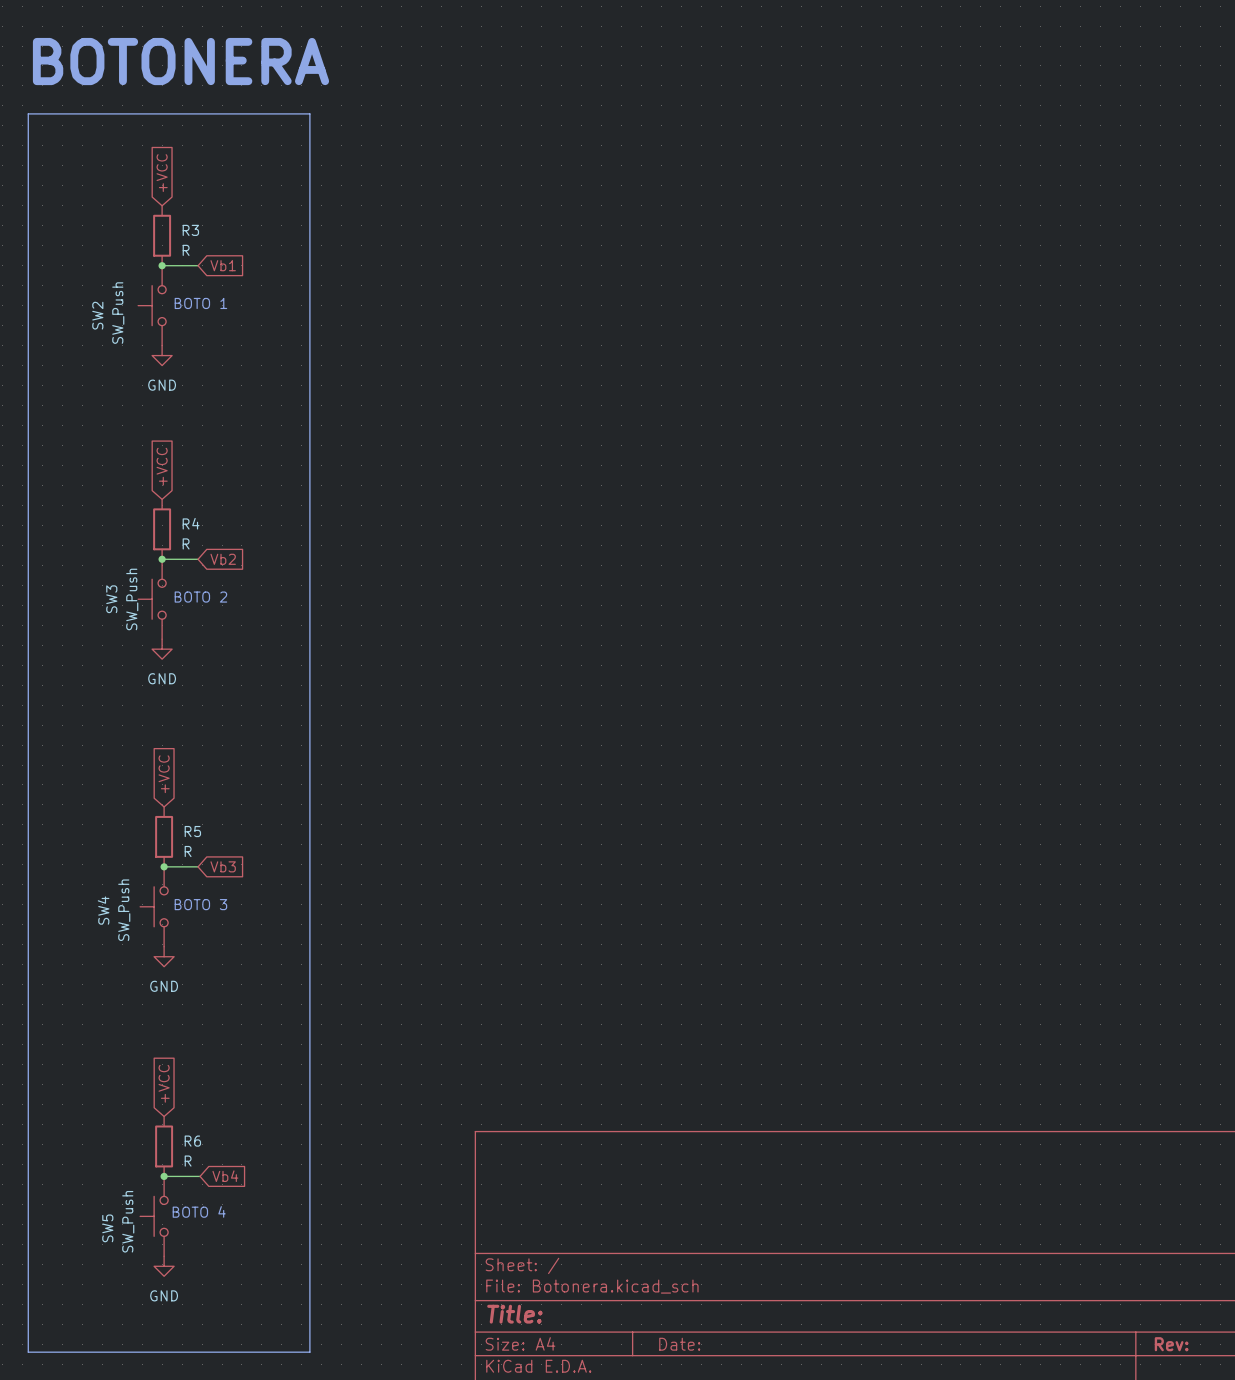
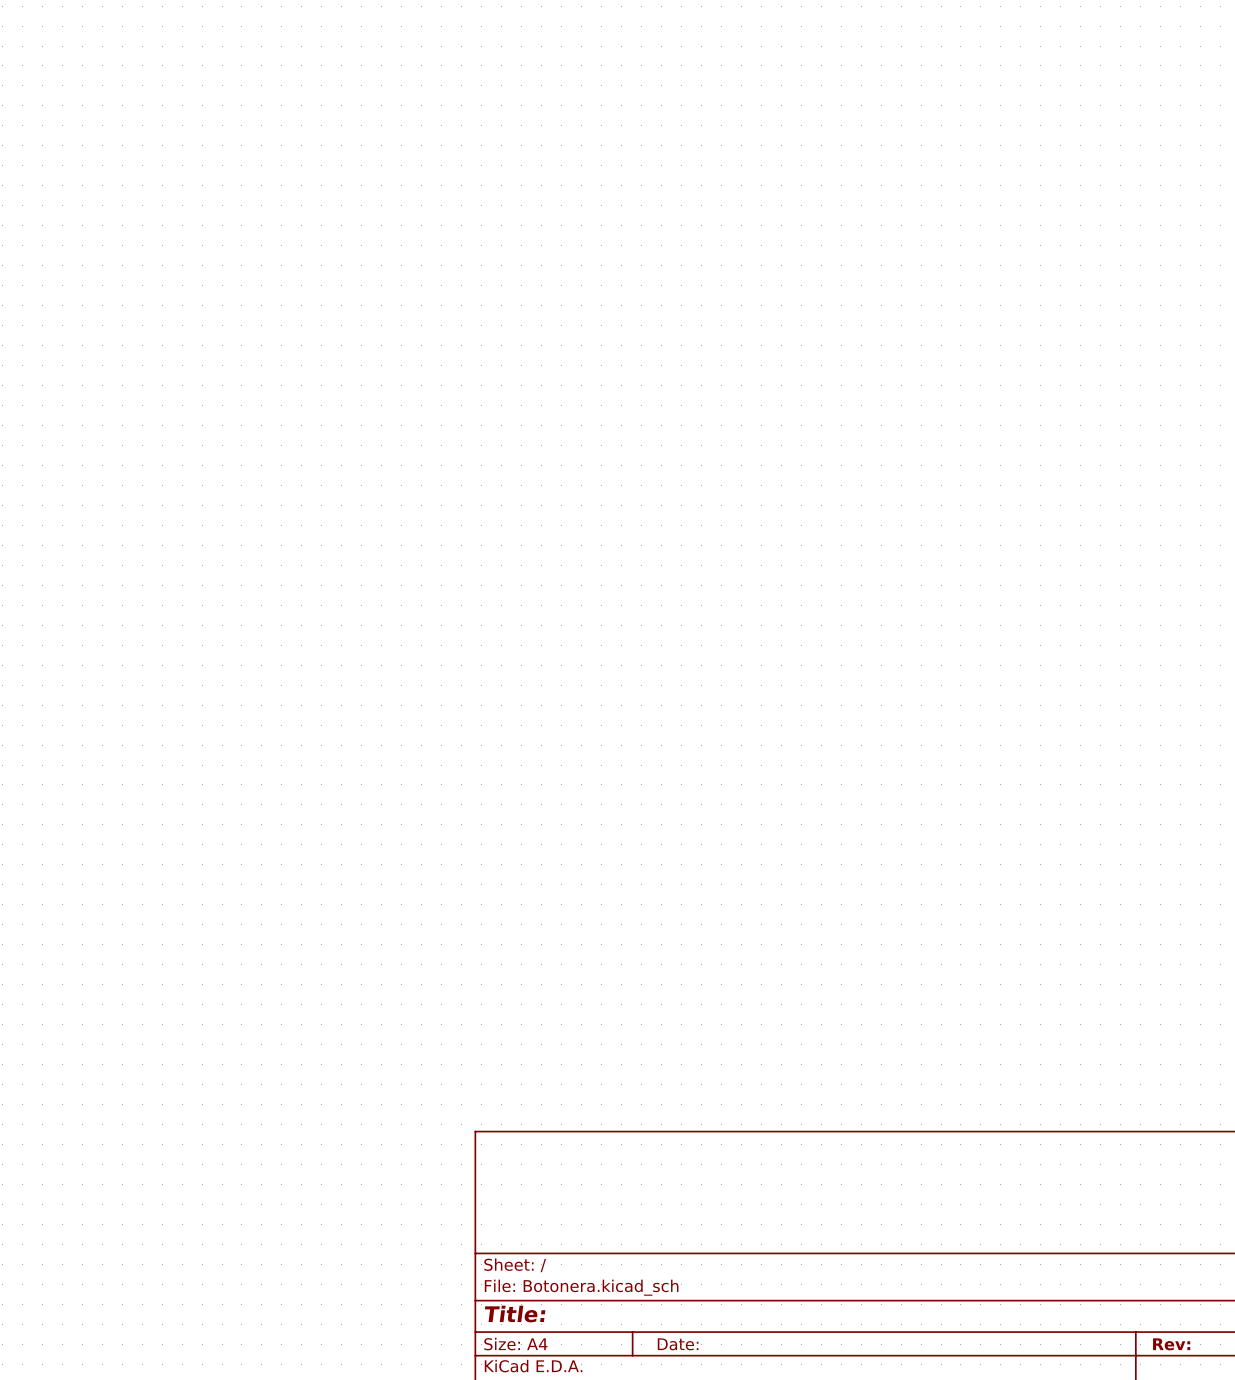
text: BOTONERA (180, 61) -> none
line: (28, 113) (28, 1352) (309, 1352) (309, 113) (28, 113) -> none
global label: +VCC (162, 173) -> none
R3: R (162, 235) -> none
wire: (162, 265) (198, 265) -> none
junction: (162, 265) -> none
global label: Vb1 (223, 265) -> none
text: BOTO 1 (200, 303) -> none
SW2: SW_Push (152, 305) -> none
power symbol: GND (162, 355) -> none
global label: +VCC (162, 466) -> none
R4: R (162, 529) -> none
wire: (162, 559) (198, 559) -> none
junction: (162, 559) -> none
global label: Vb2 (223, 559) -> none
text: BOTO 2 (200, 597) -> none
SW3: SW_Push (152, 599) -> none
power symbol: GND (162, 649) -> none
global label: +VCC (164, 774) -> none
R5: R (164, 836) -> none
wire: (164, 866) (198, 866) -> none
junction: (164, 866) -> none
global label: Vb3 (223, 866) -> none
text: BOTO 3 (200, 904) -> none
SW4: SW_Push (154, 906) -> none
power symbol: GND (164, 956) -> none
global label: +VCC (164, 1083) -> none
R6: R (164, 1146) -> none
wire: (164, 1176) (200, 1176) -> none
junction: (164, 1176) -> none
global label: Vb4 (225, 1176) -> none
text: BOTO 4 (199, 1211) -> none
SW5: SW_Push (154, 1216) -> none
power symbol: GND (164, 1266) -> none

